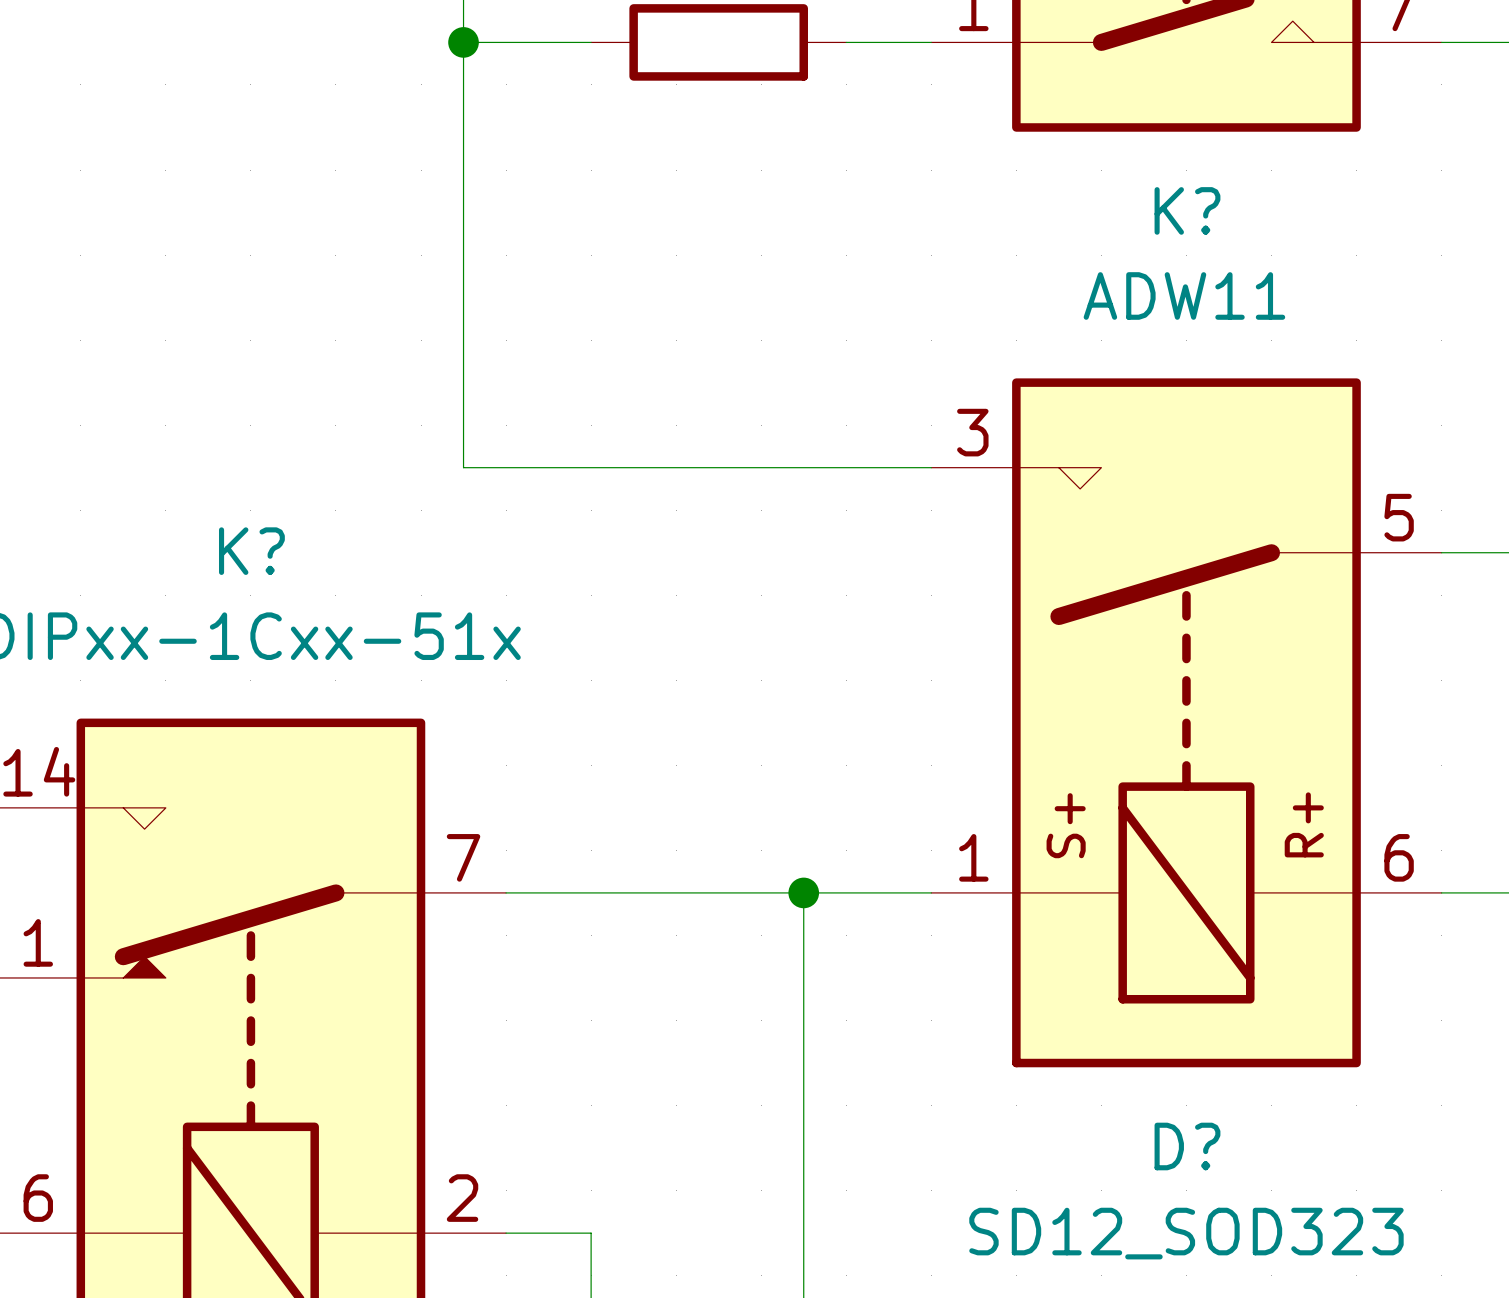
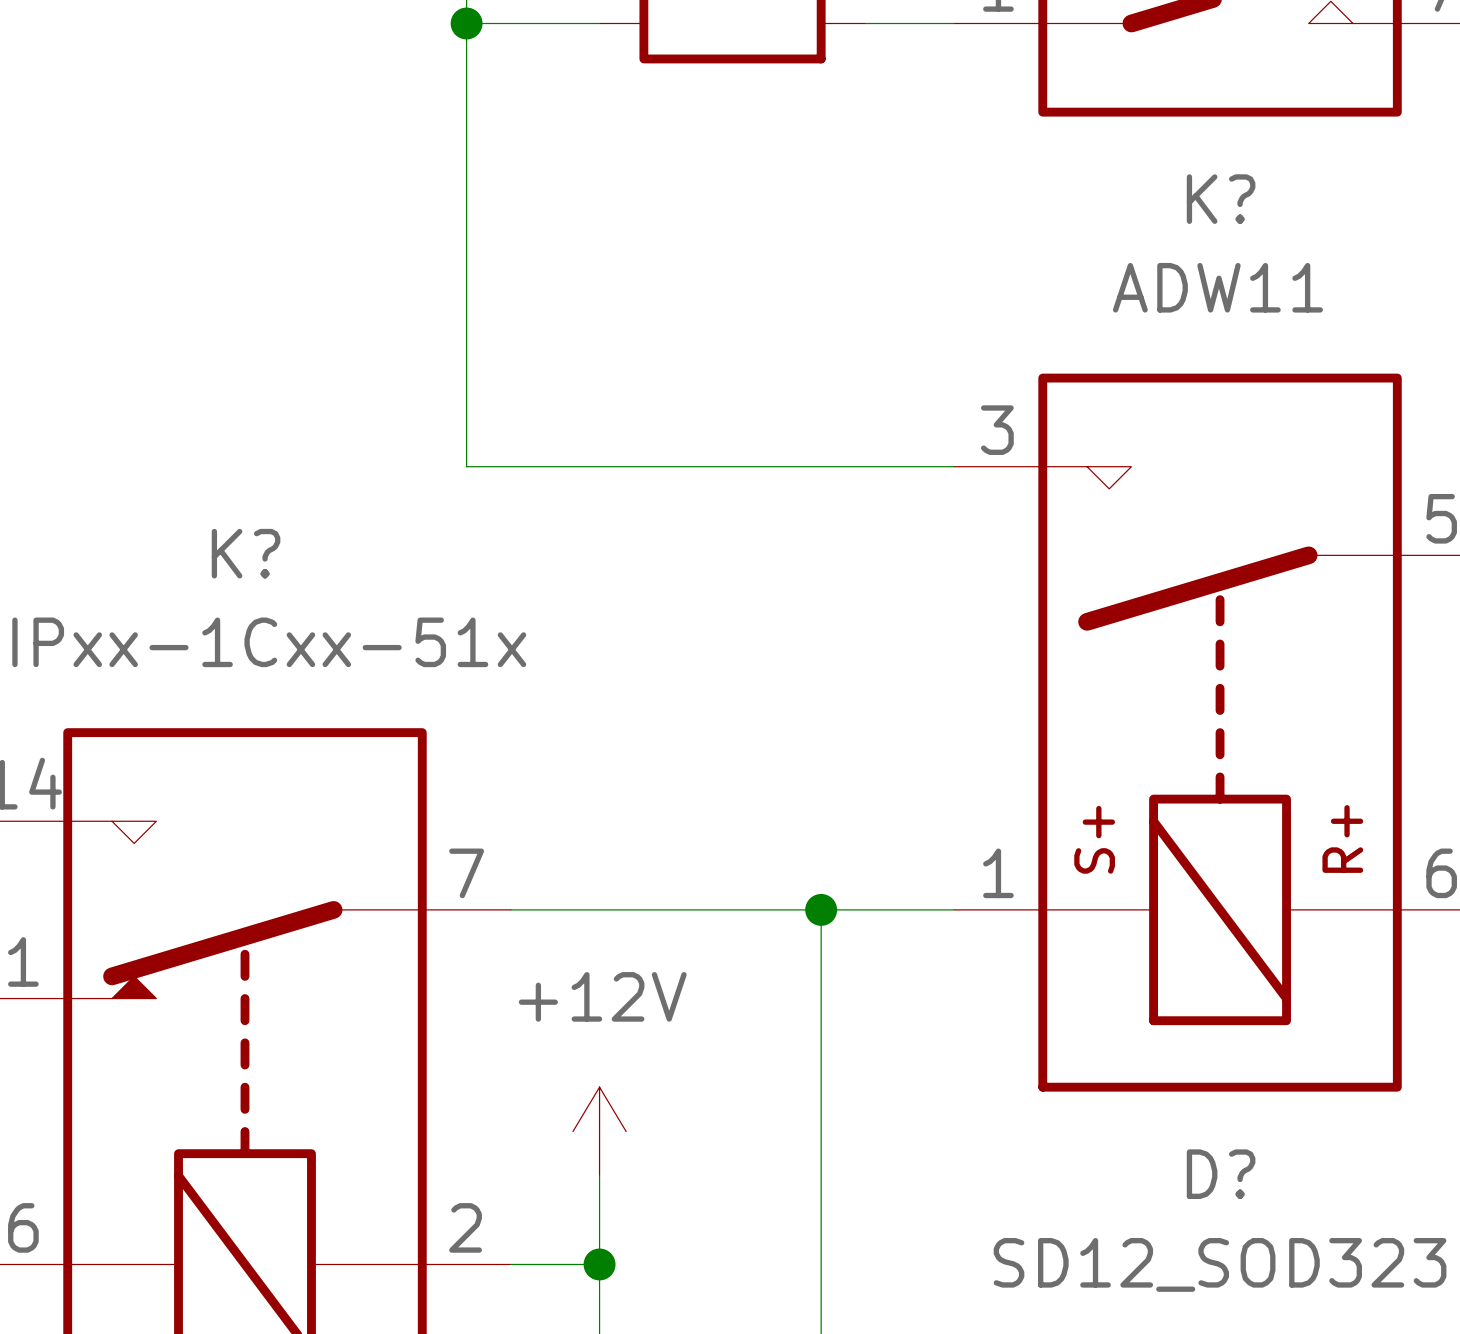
power symbol: none -> +12V (599, 1131)
wire: none -> (599, 1175) (599, 1264)
junction: none -> (599, 1264)

